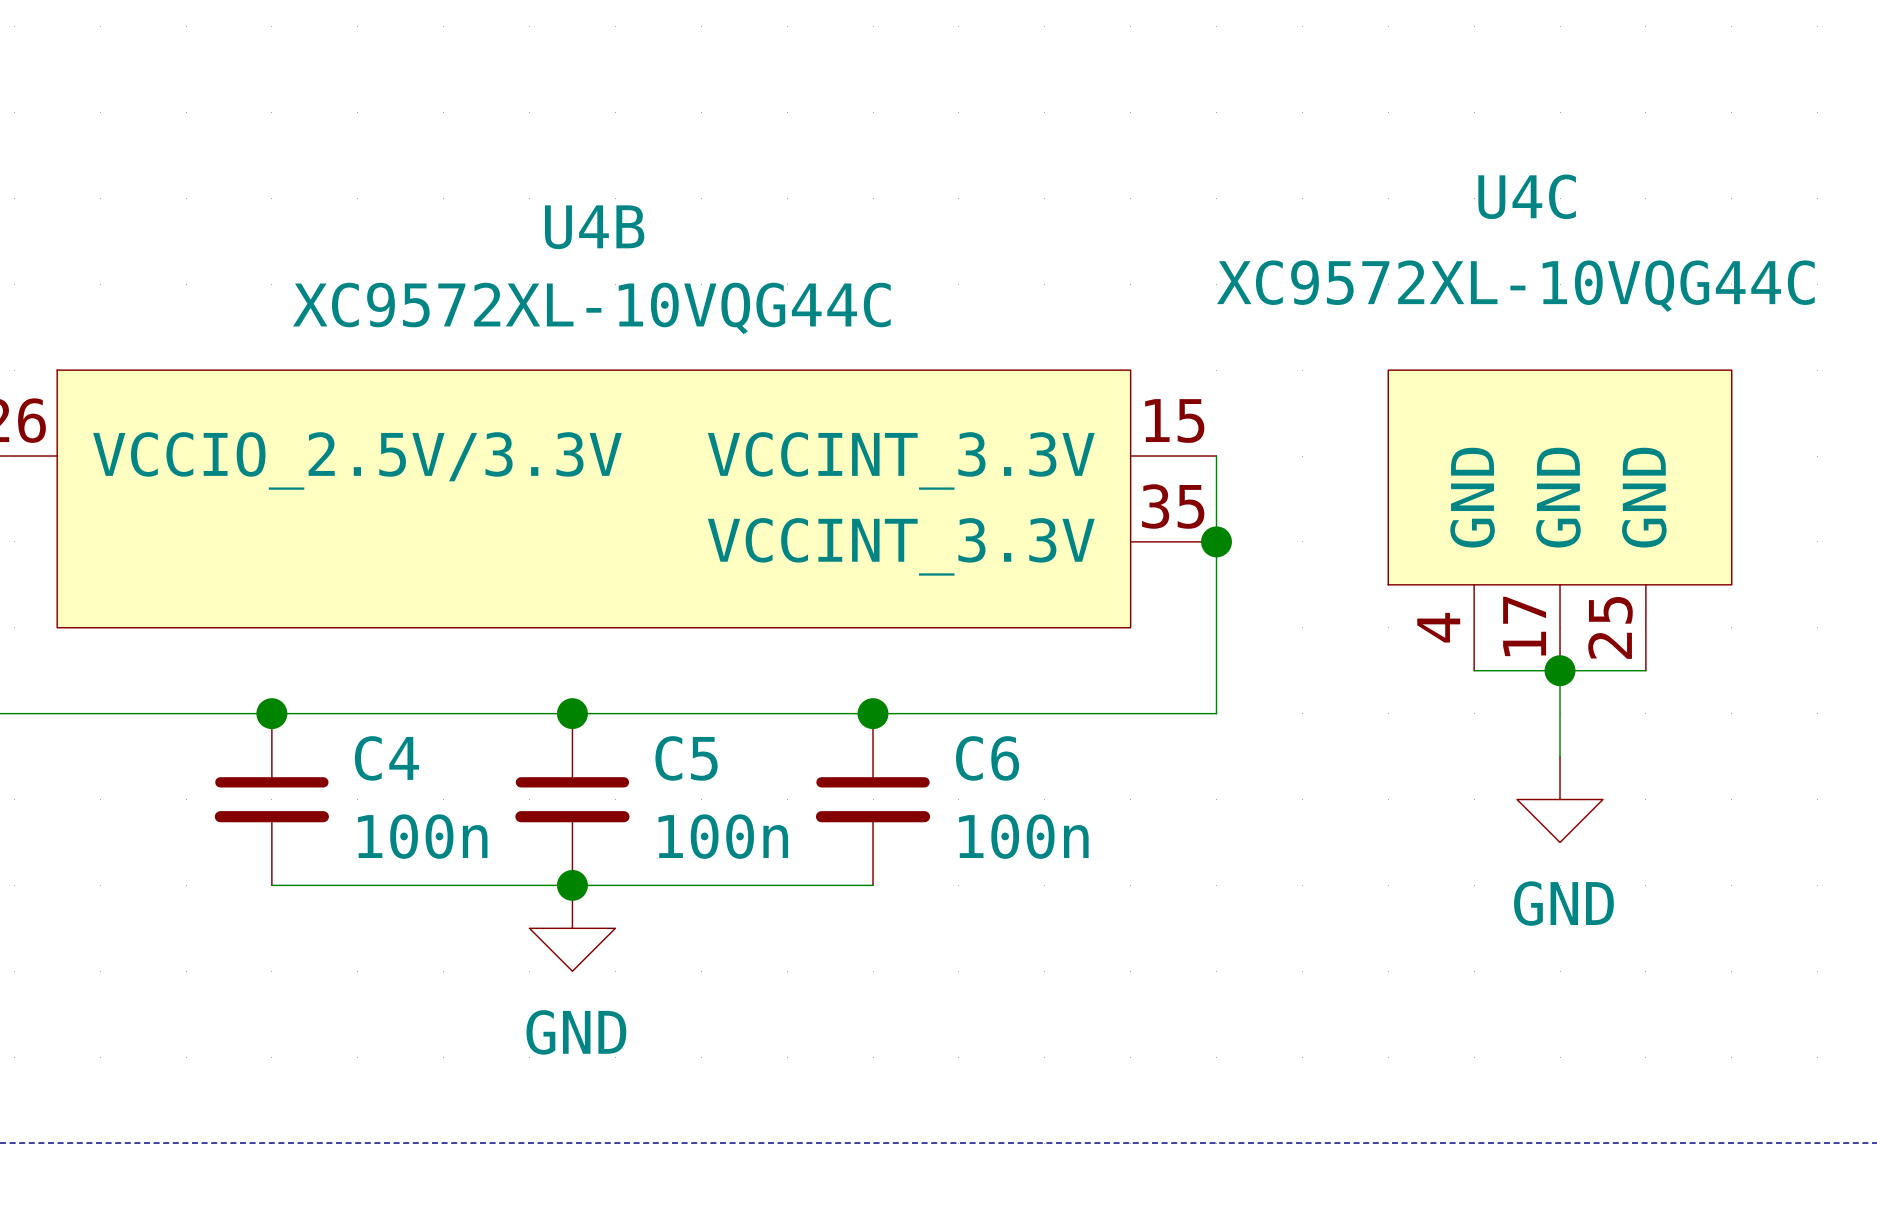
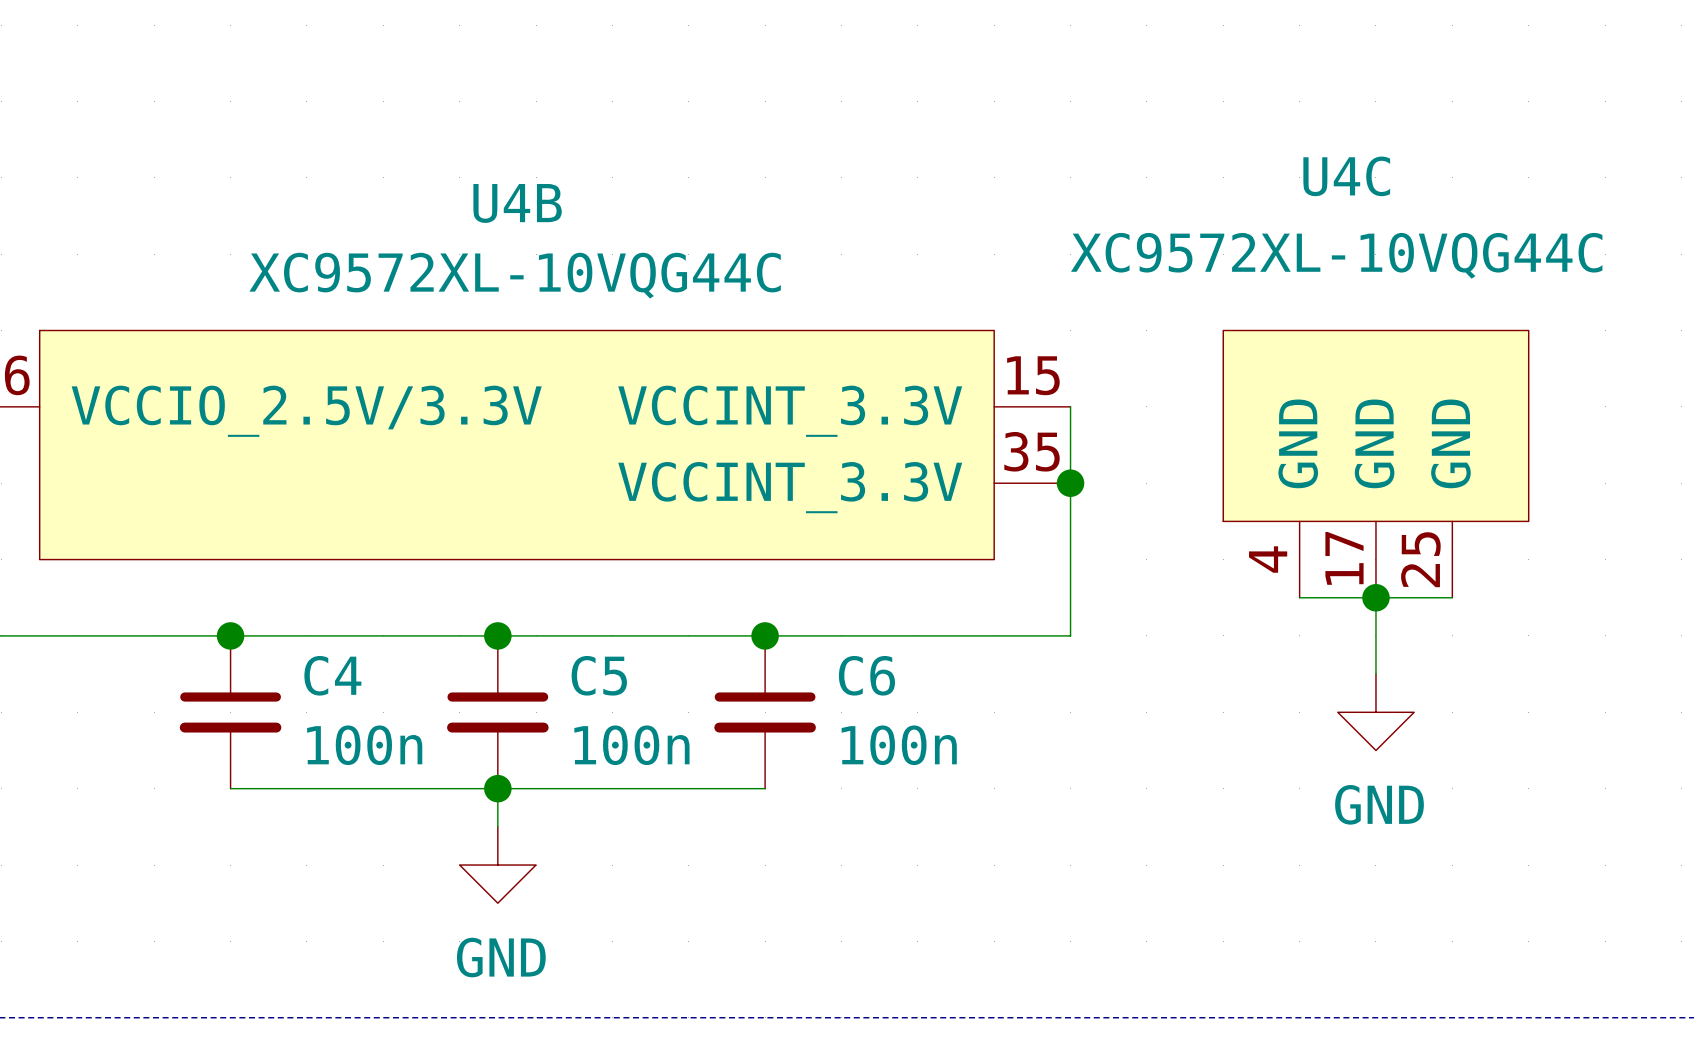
power symbol position: GND (572, 928) -> GND (497, 865)

